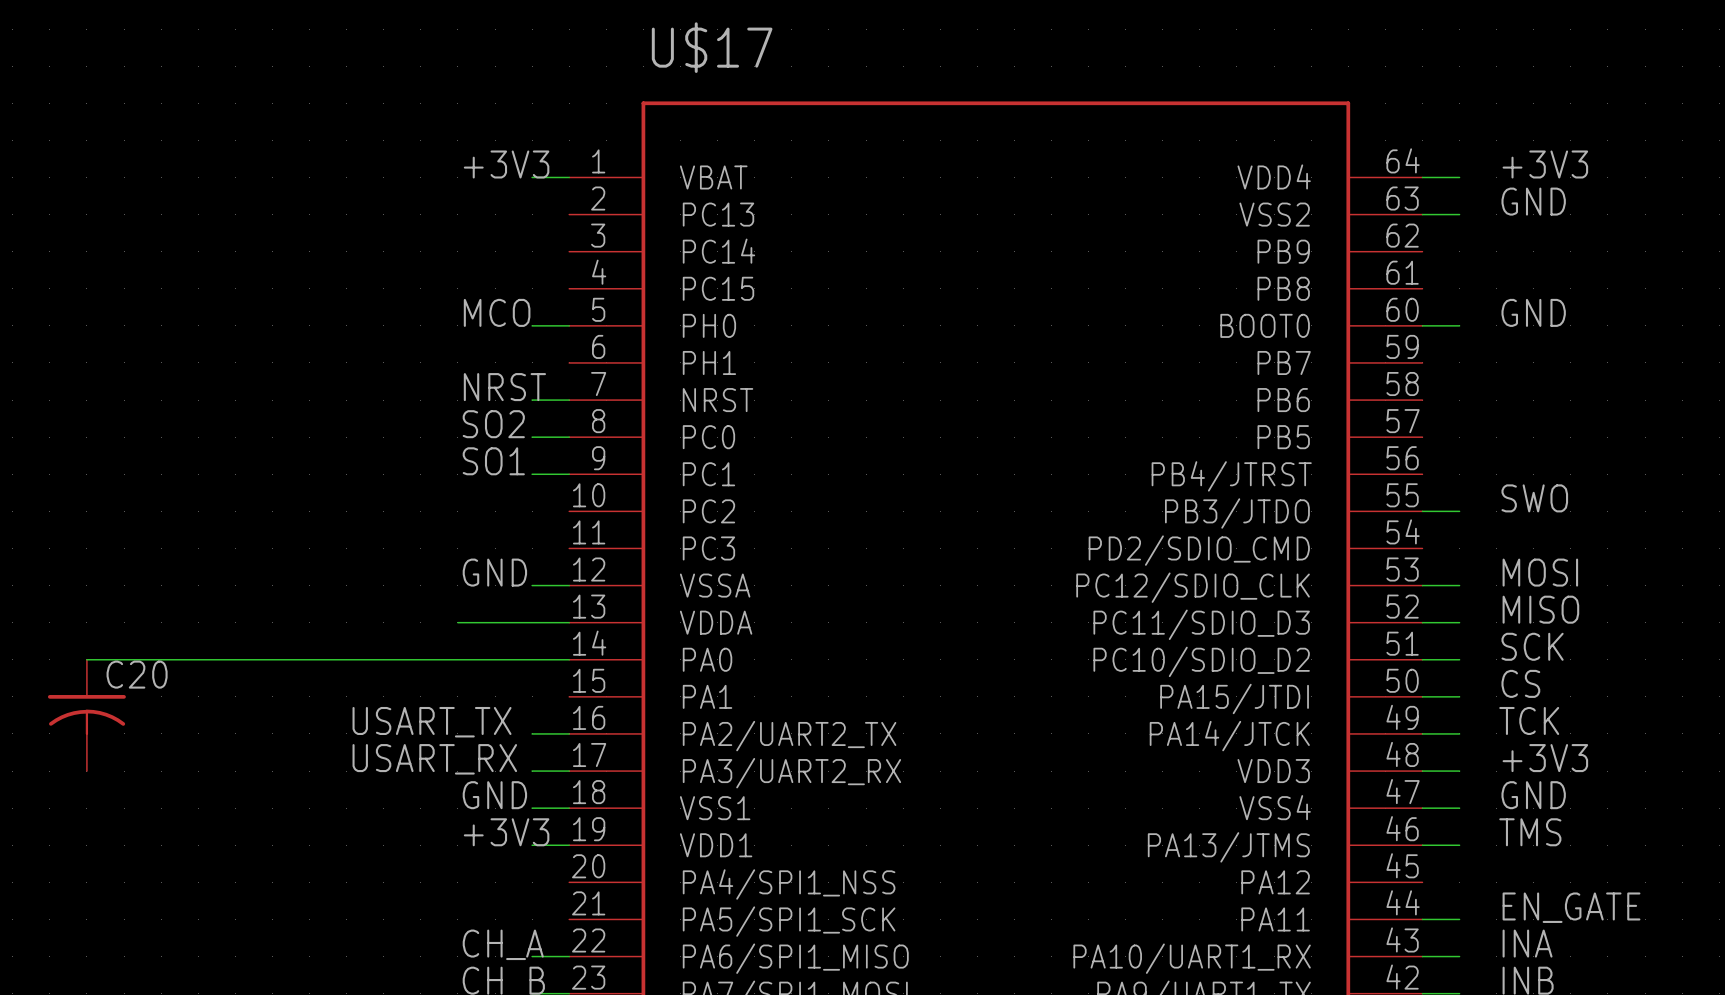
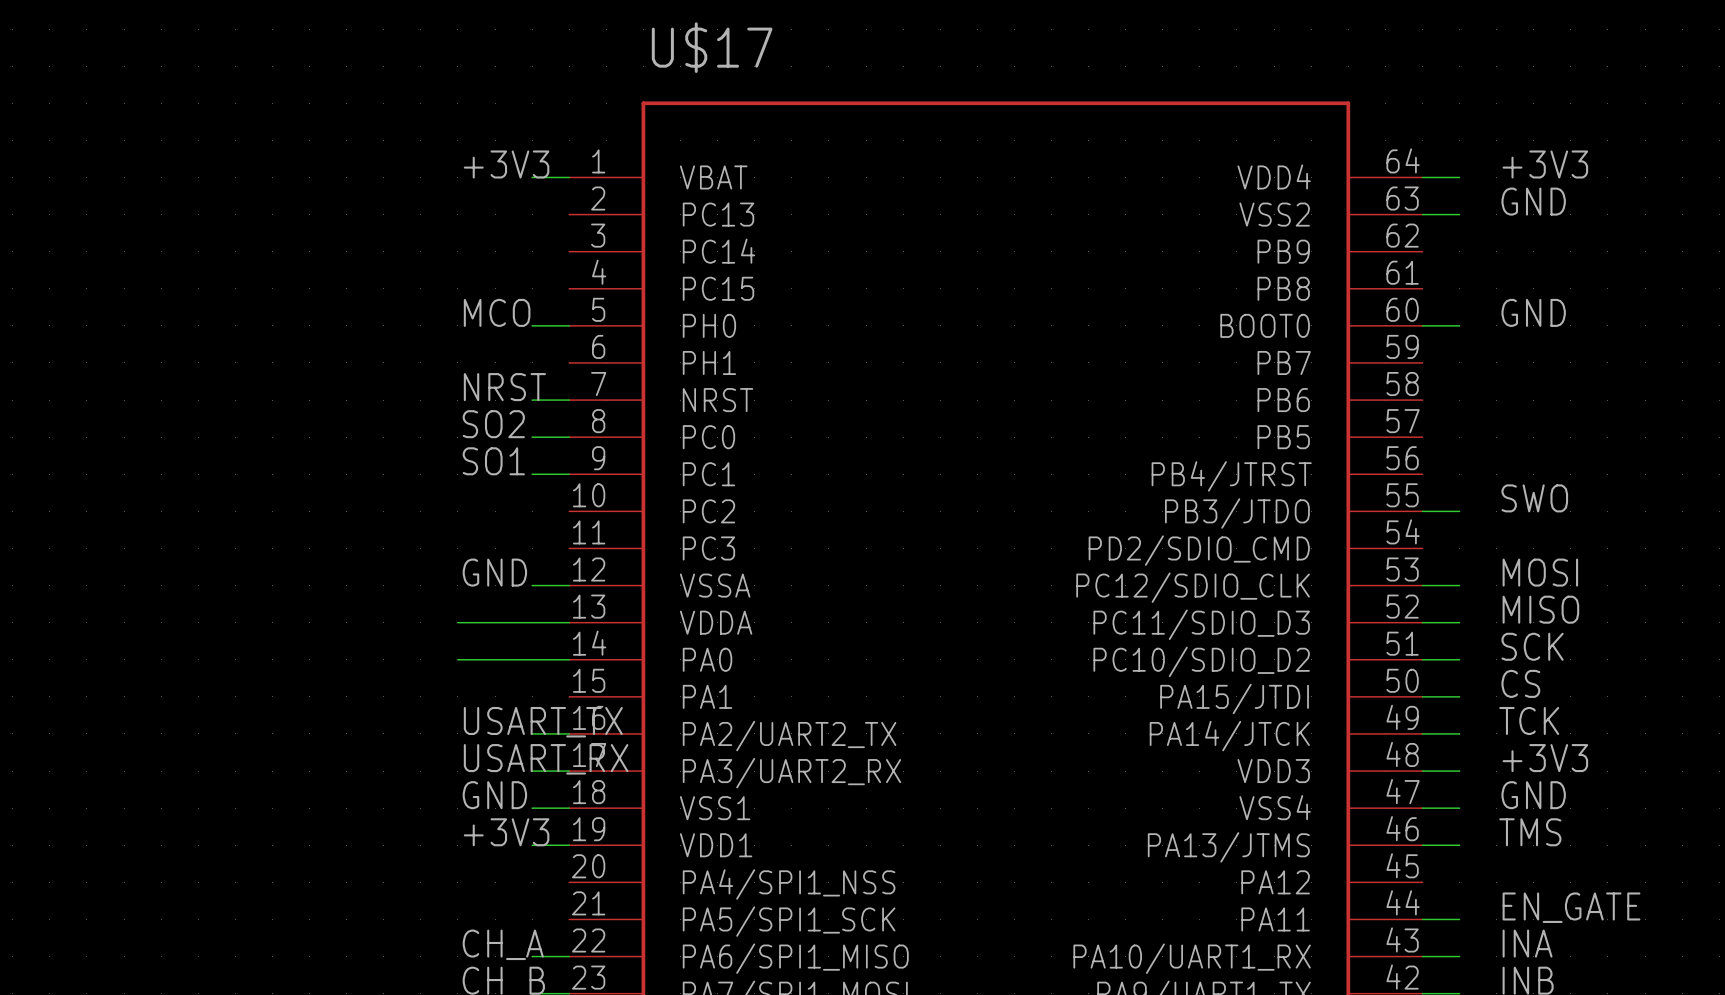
wire: (86, 659) (457, 659) -> none
C20: (86, 715) -> none
label position: USART_TX (432, 722) -> USART_TX (543, 722)
label position: USART_RX (434, 759) -> USART_RX (546, 759)

